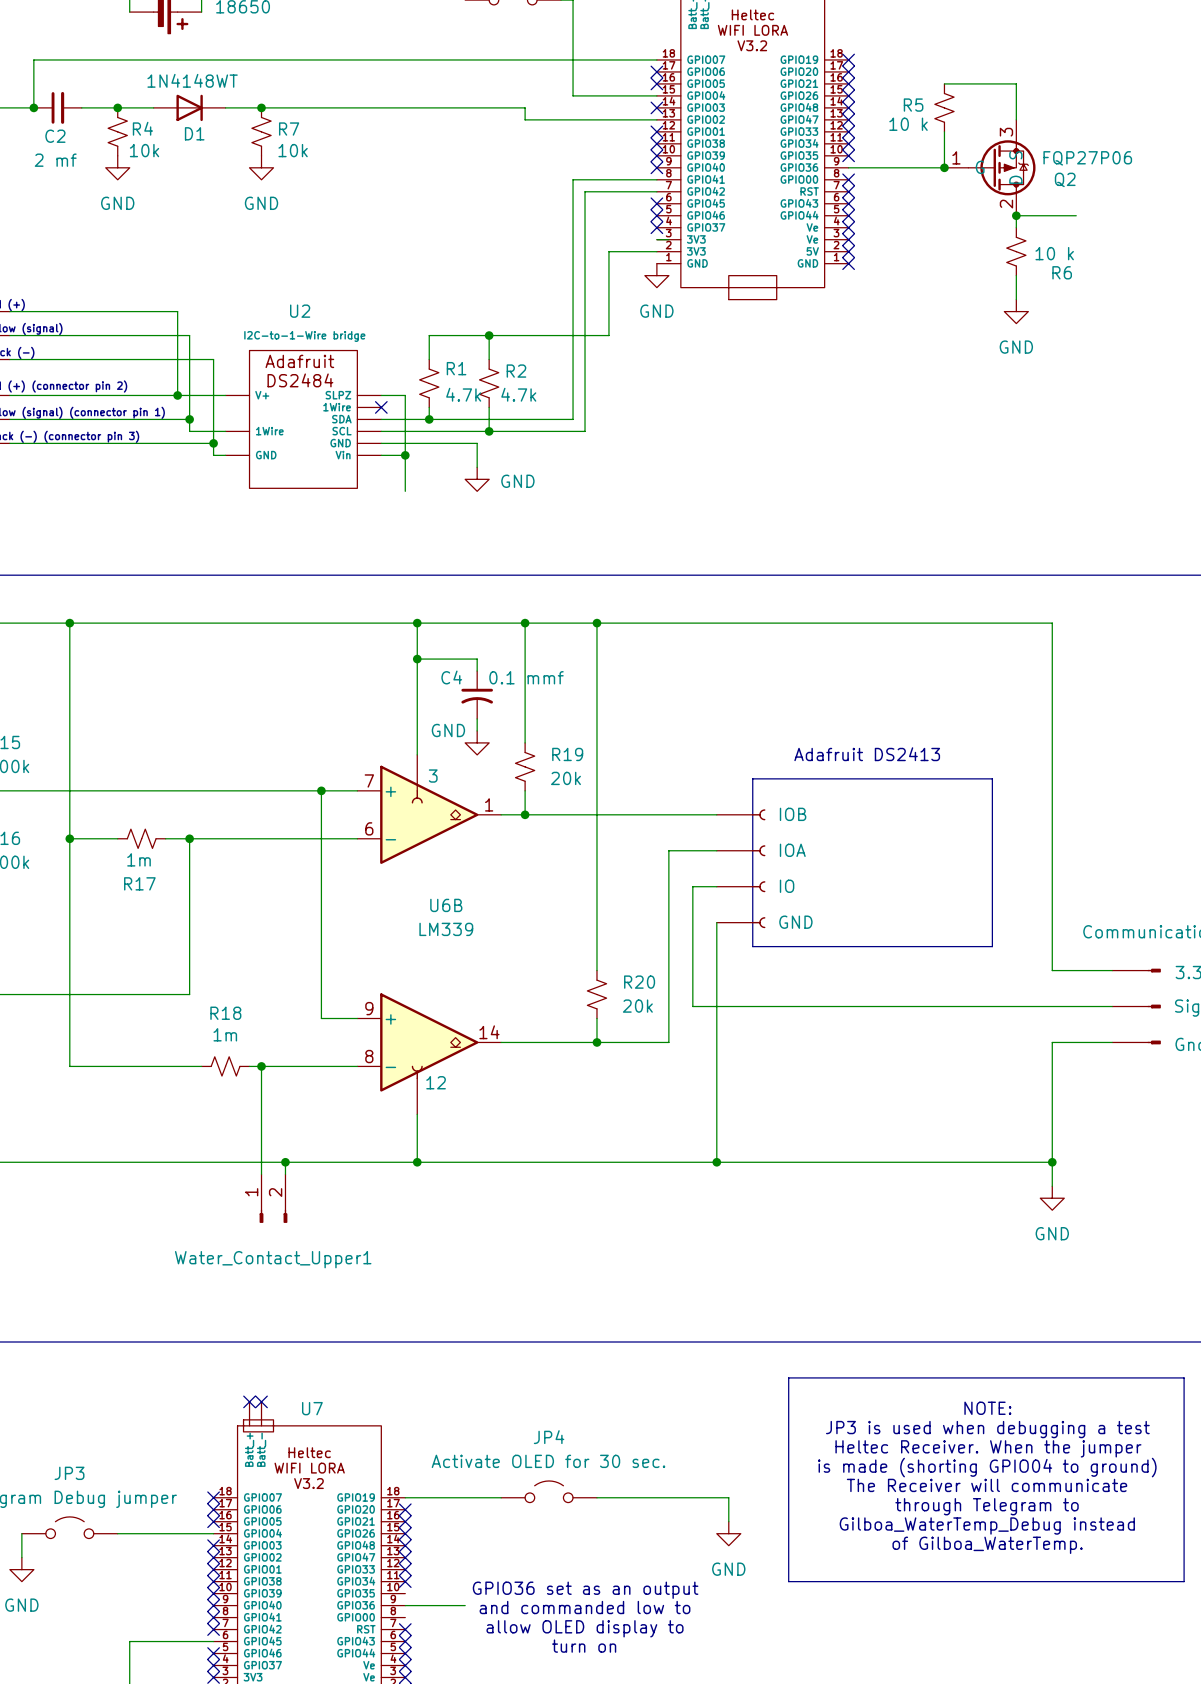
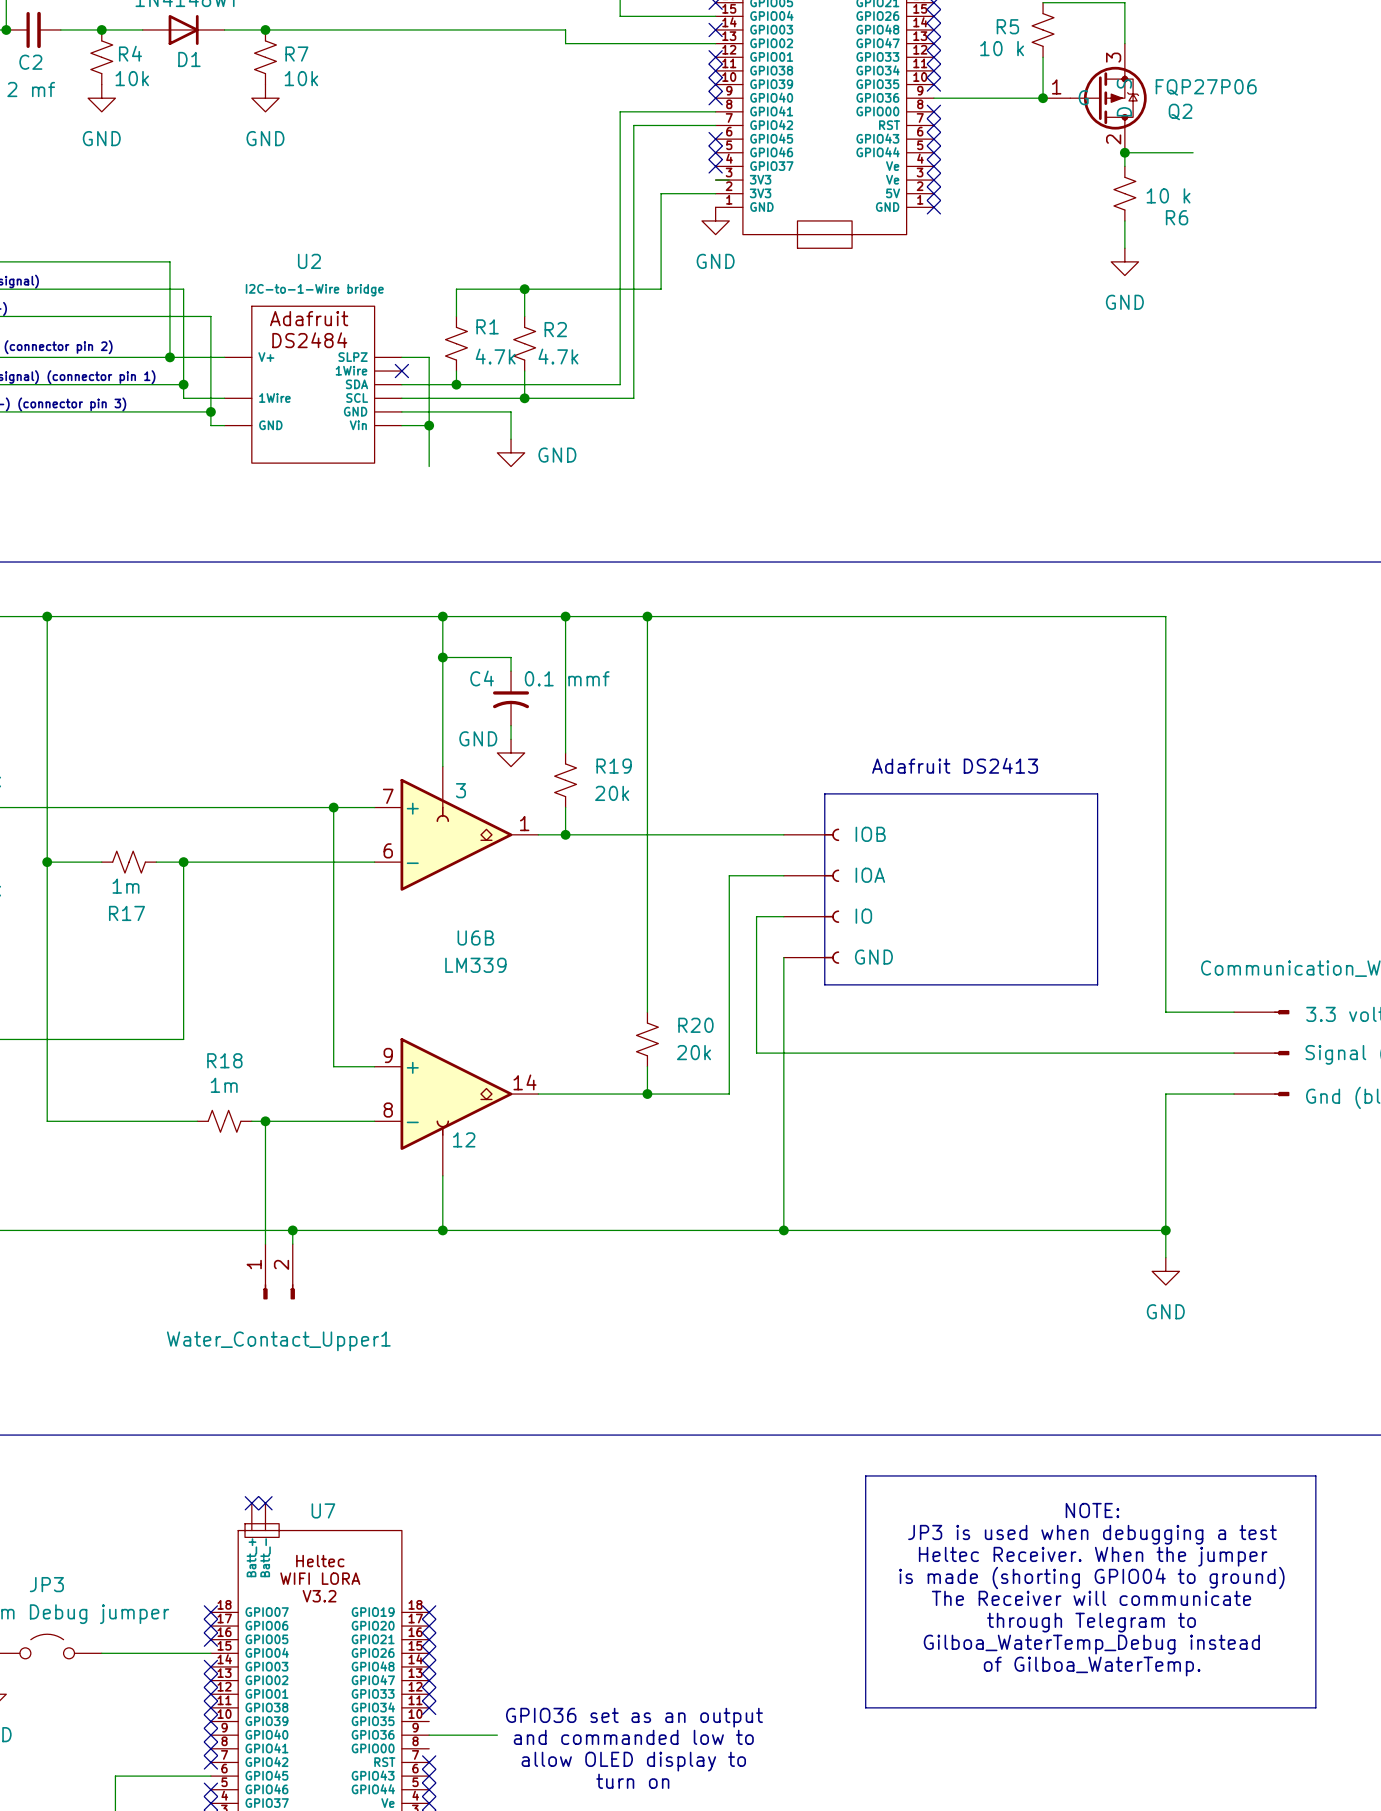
JP4: Activate OLED for 30 sec. (549, 1491) -> none
wire: (405, 1497) (501, 1497) -> none
no-connect mark: none -> (429, 1612)
wire: (596, 1497) (728, 1497) (728, 1521) -> none
power symbol: GND (728, 1533) -> none

